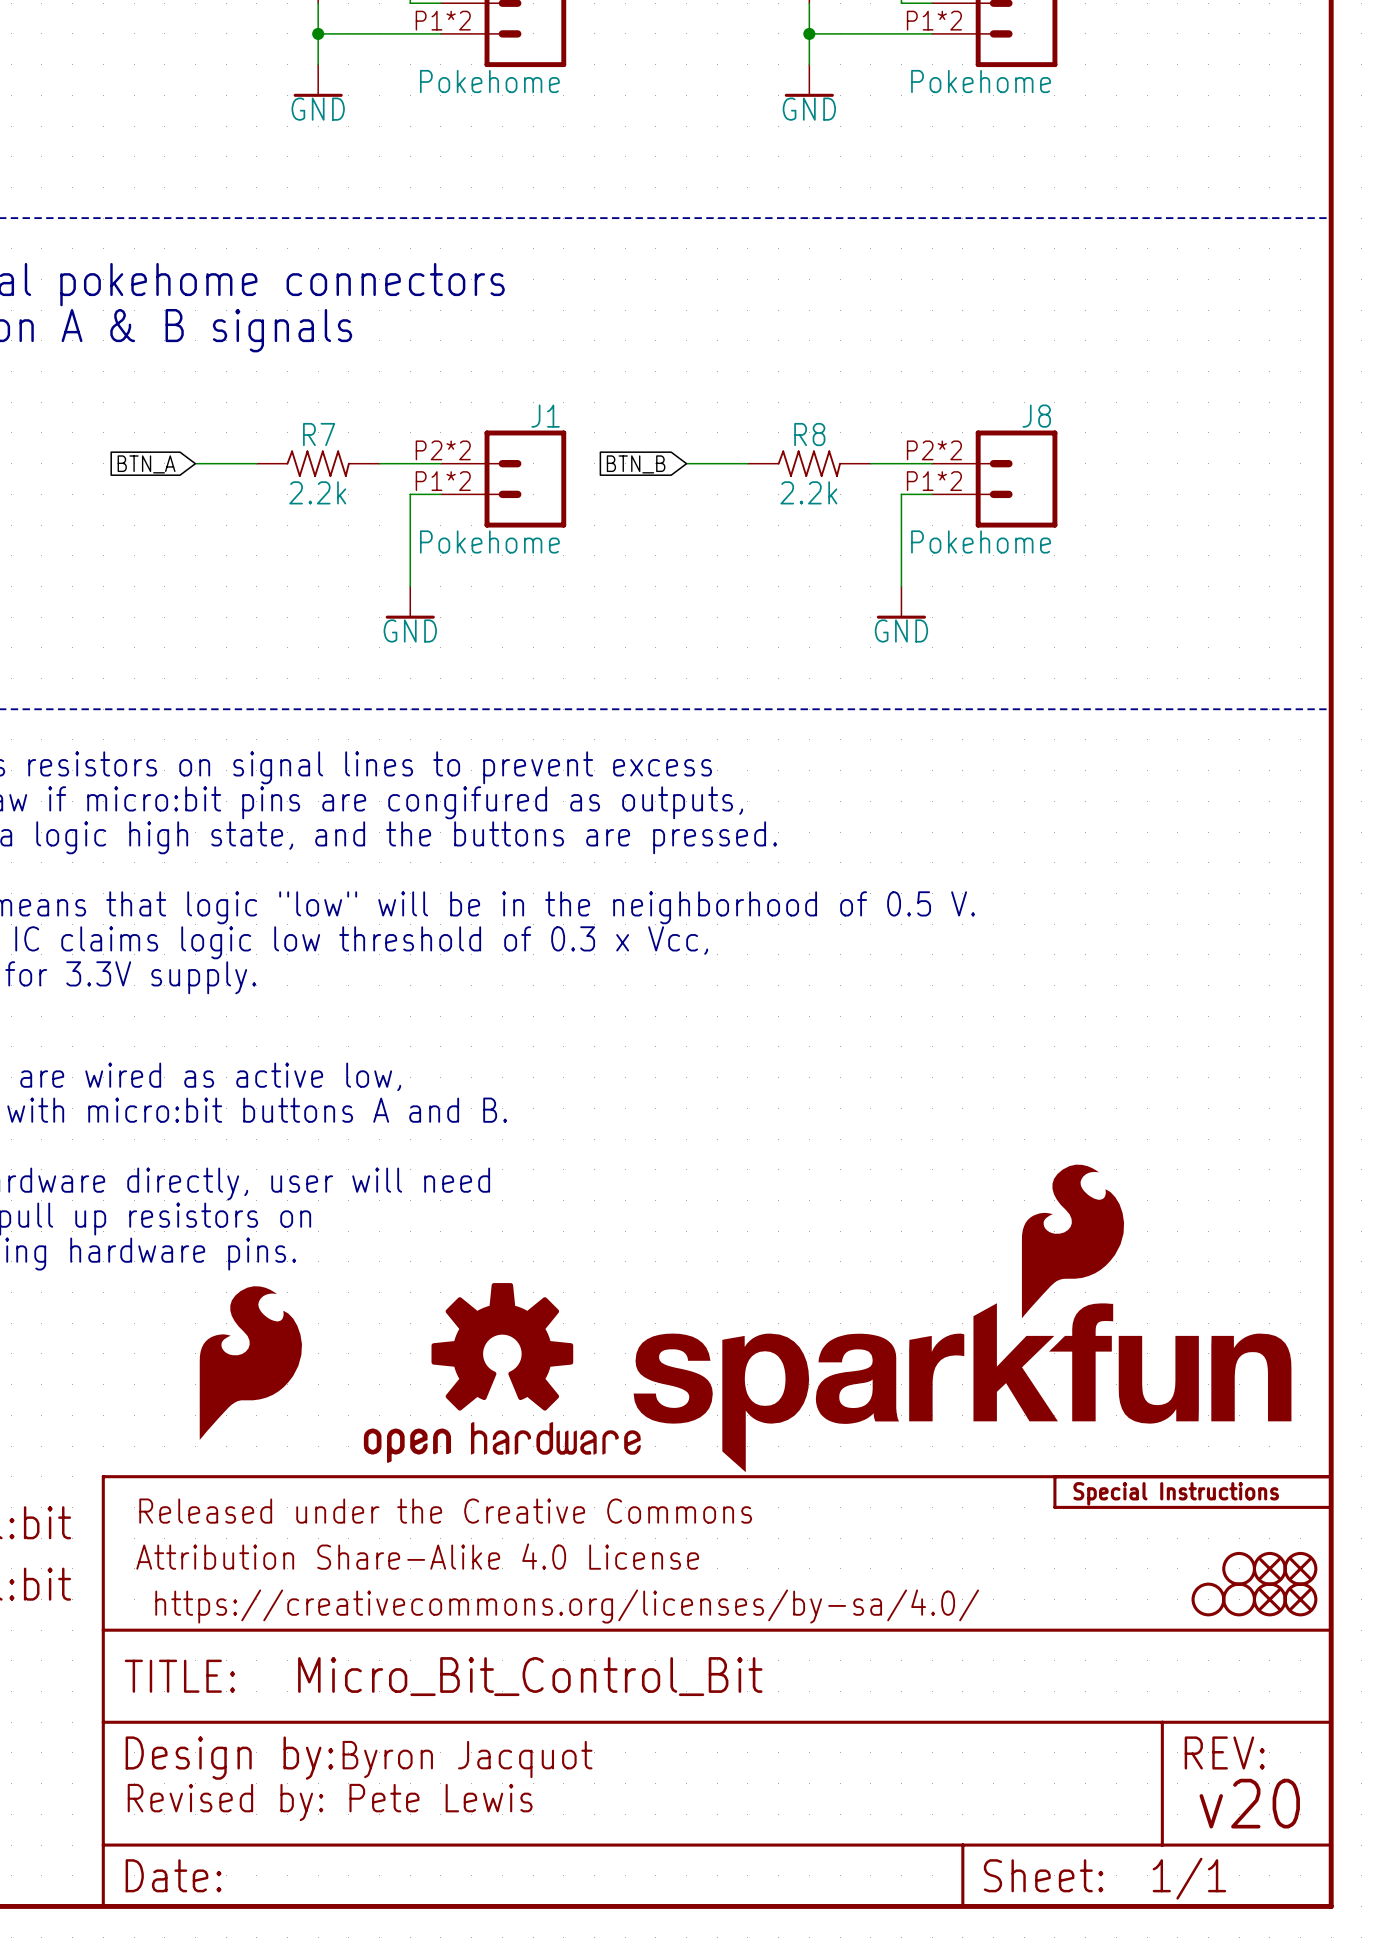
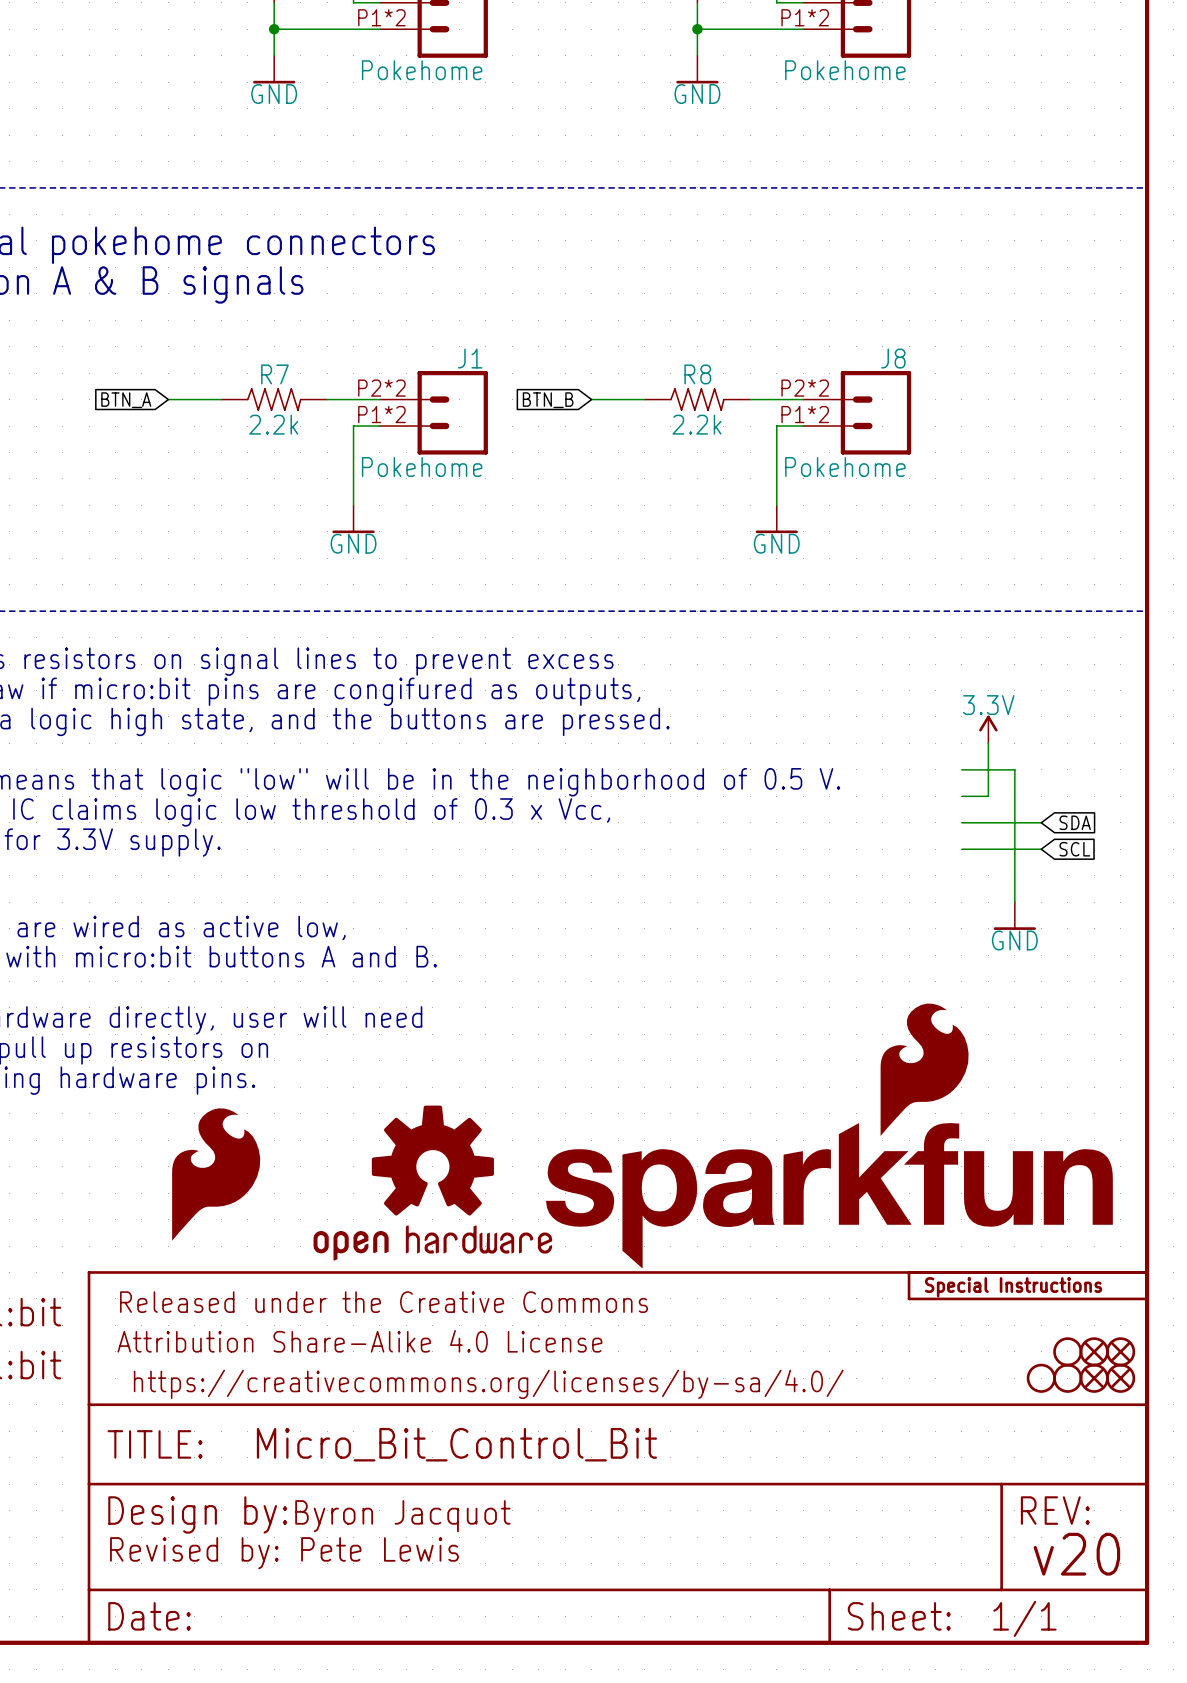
power symbol: none -> 3.3V (988, 729)
wire: none -> (988, 743) (988, 796) (961, 796)
wire: none -> (961, 769) (1014, 769) (1014, 902)
wire: none -> (961, 822) (1041, 822)
global label: none -> SDA (1075, 822)
wire: none -> (961, 849) (1041, 849)
global label: none -> SCL (1074, 849)
power symbol: none -> GND (1014, 916)

